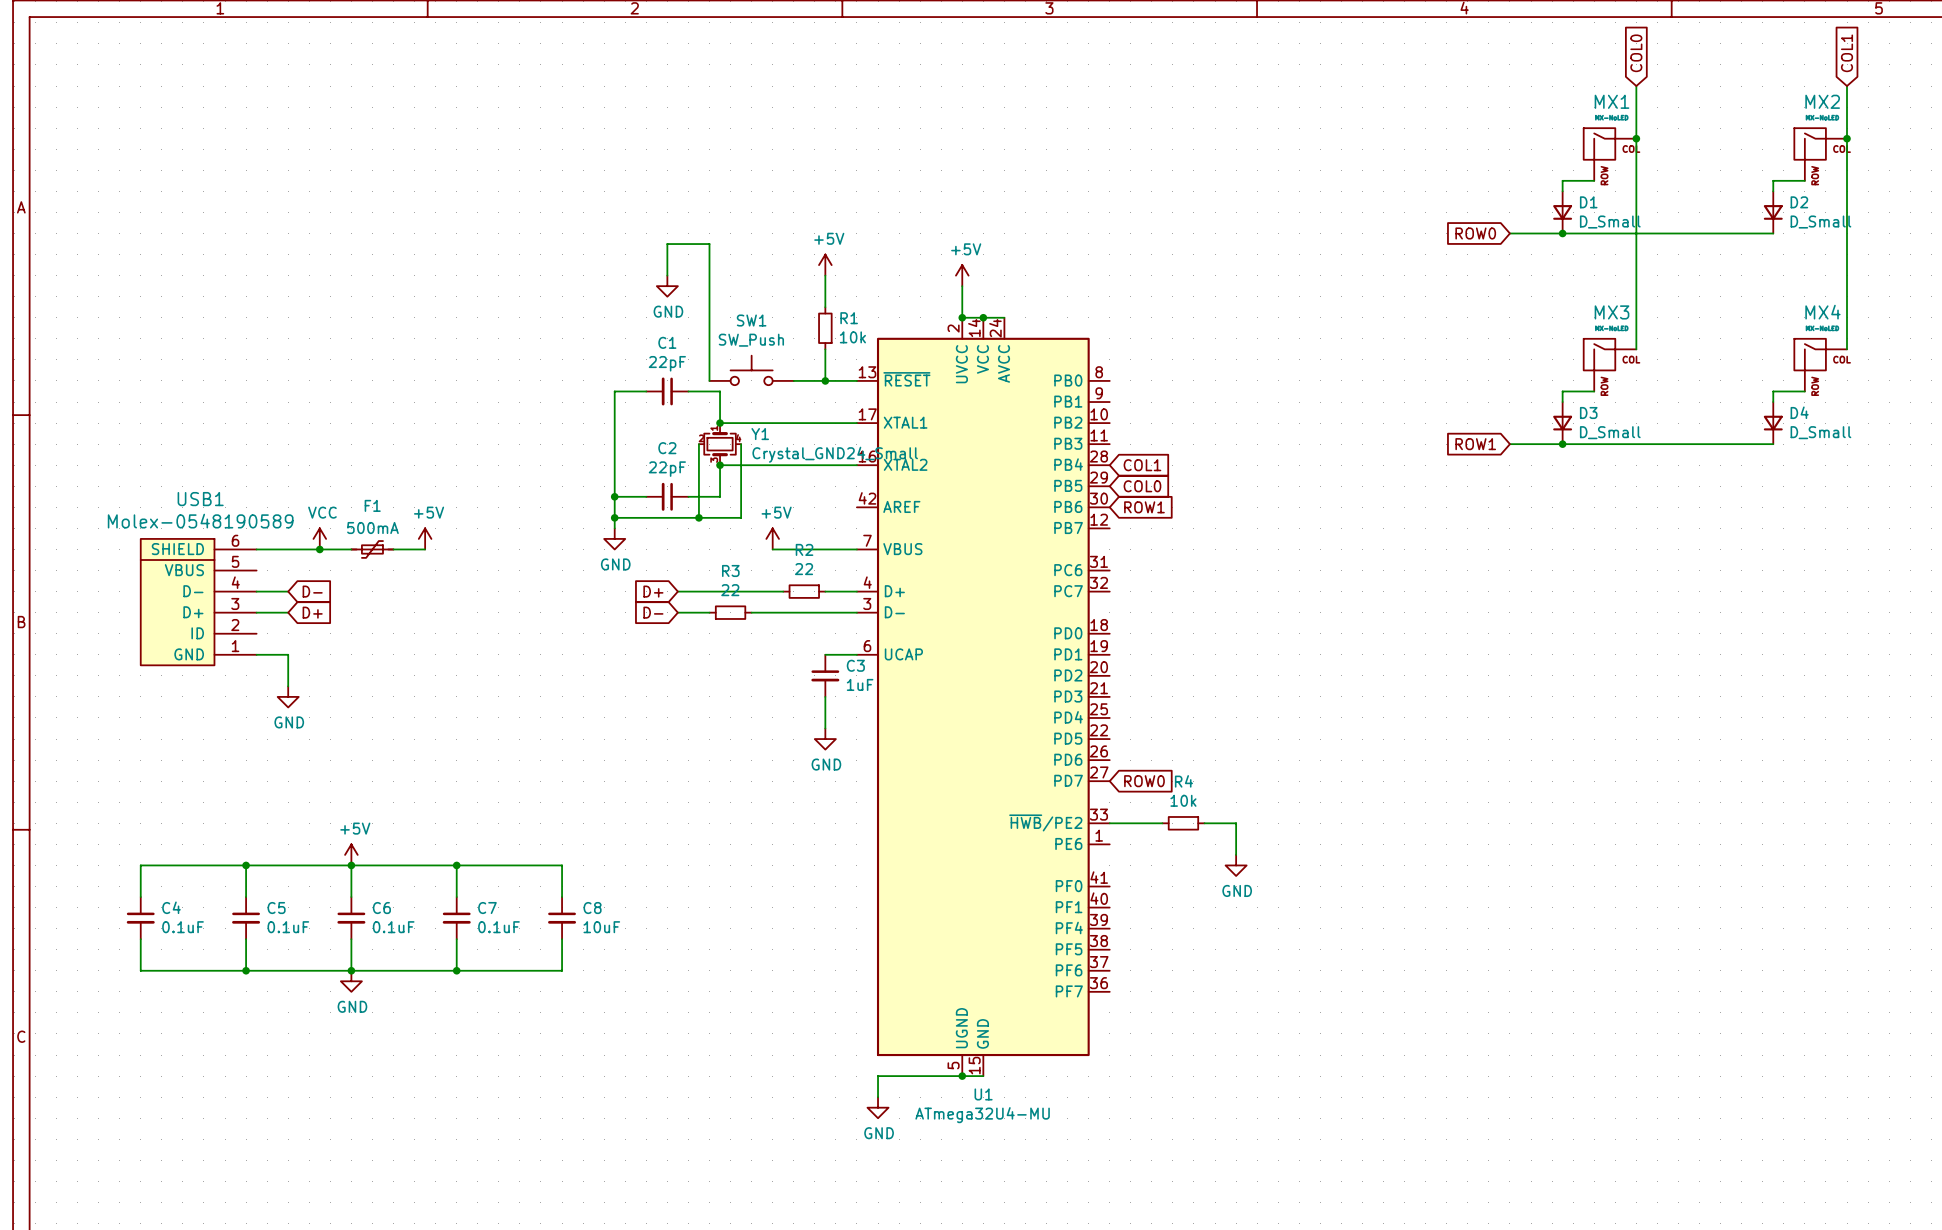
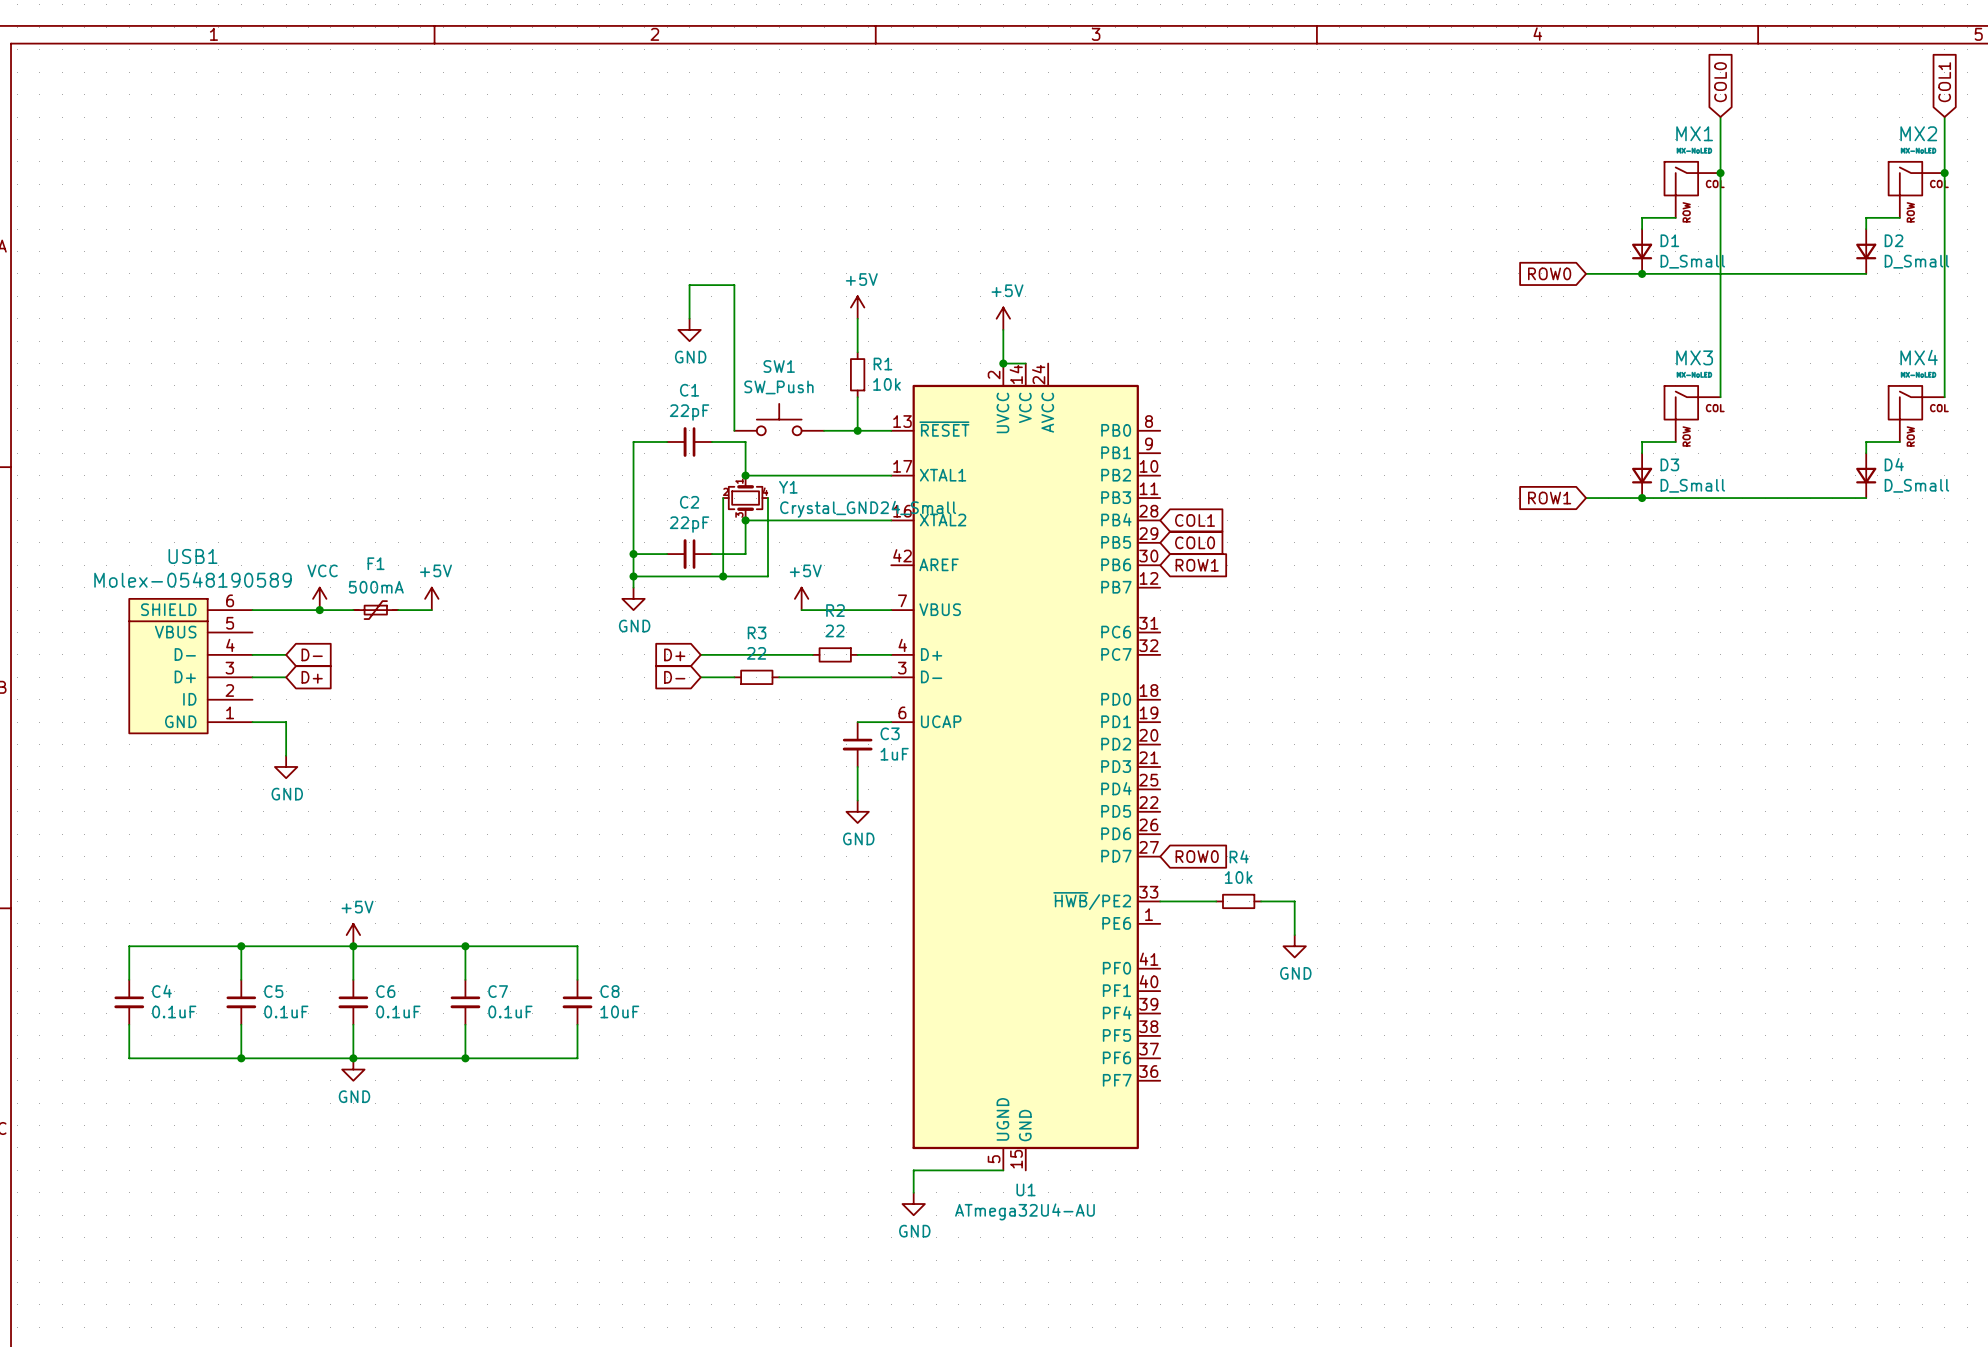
wire: (983, 317) (1004, 317) -> none
junction: (983, 317) -> none
wire: (962, 1076) (983, 1076) -> none
junction: (962, 1076) -> none
U1 value: ATmega32U4-MU (982, 1115) -> ATmega32U4-AU (1024, 1211)

